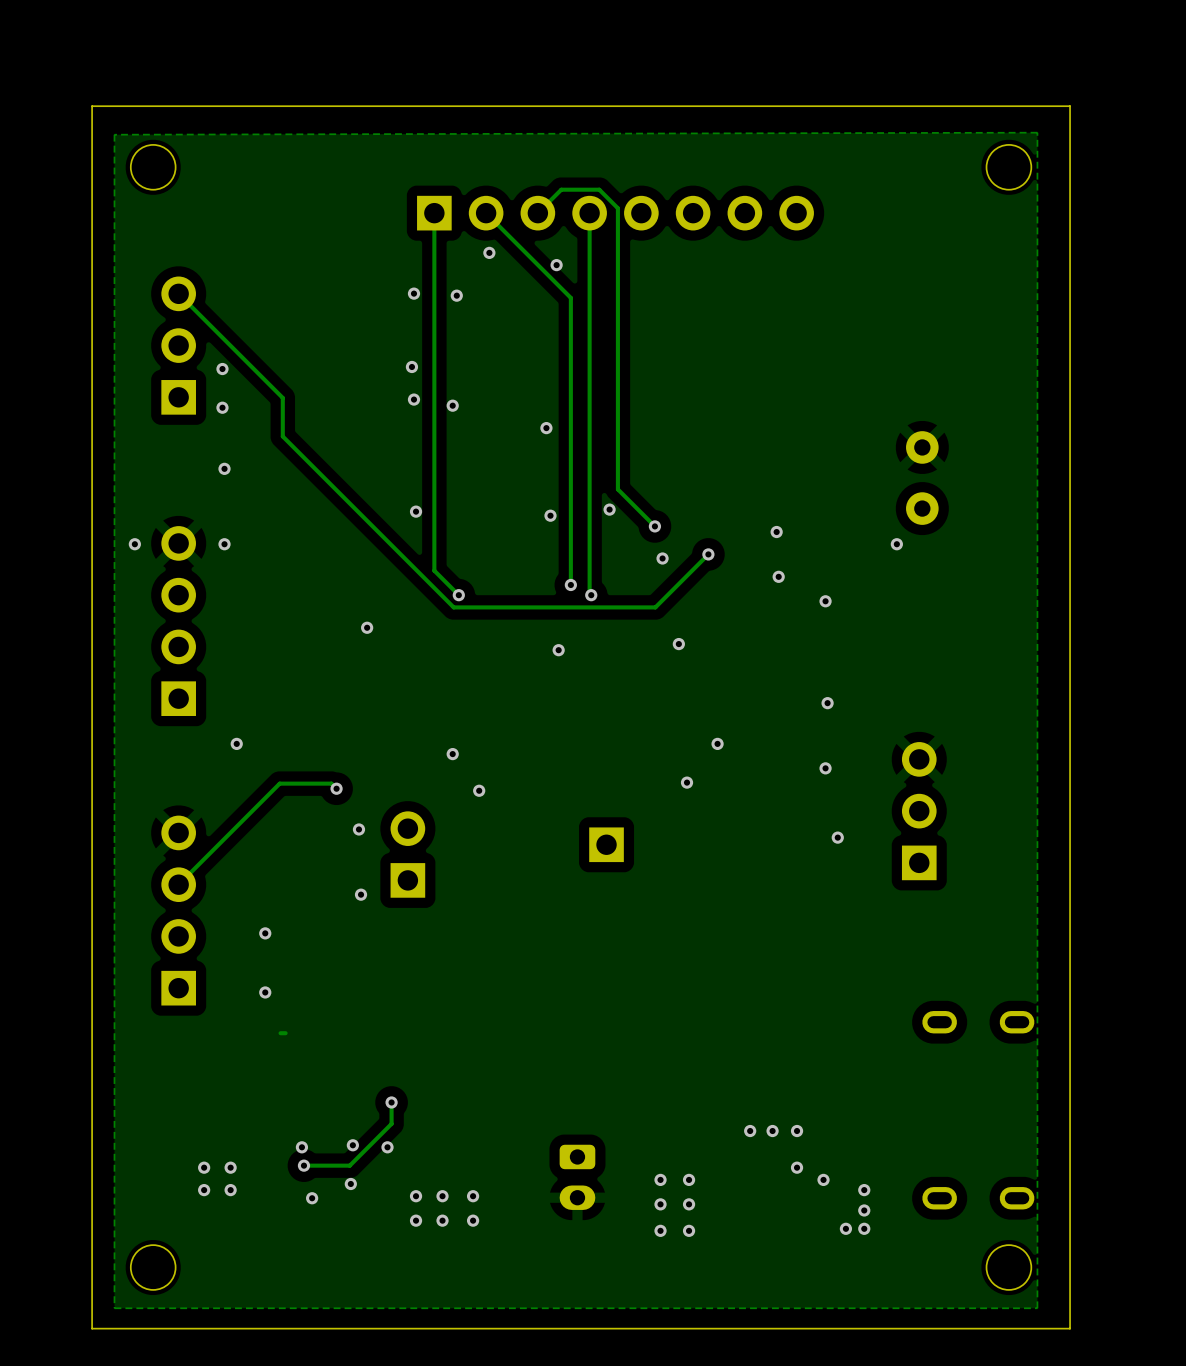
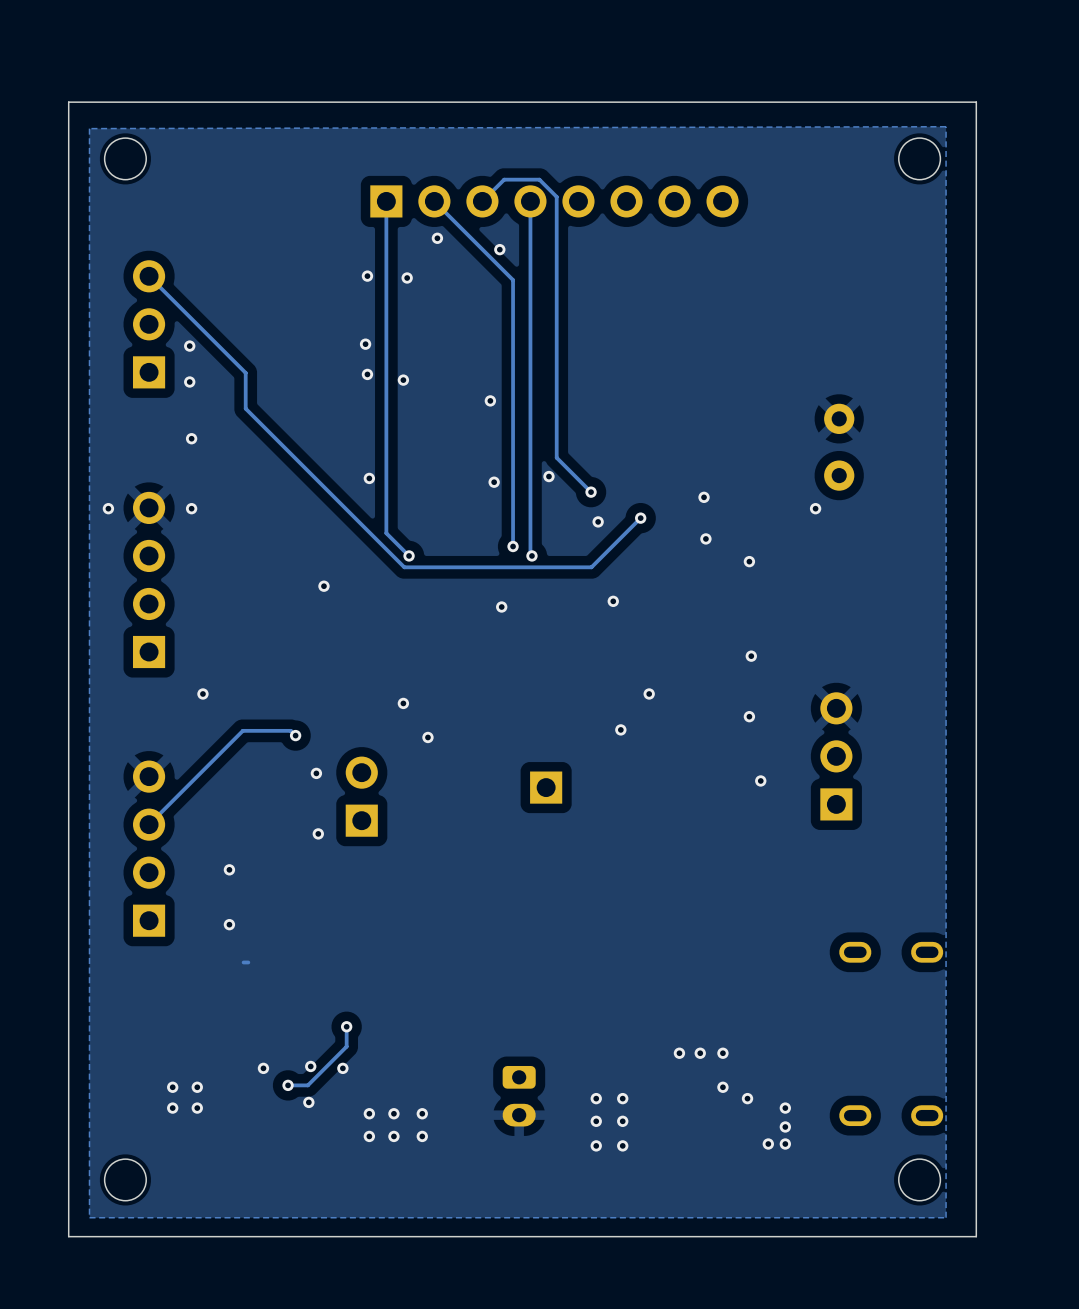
via: (303, 1165) -> none
track: (328, 1165) (303, 1165) -> none
via: none -> (288, 1085)
via: (312, 1198) -> none

